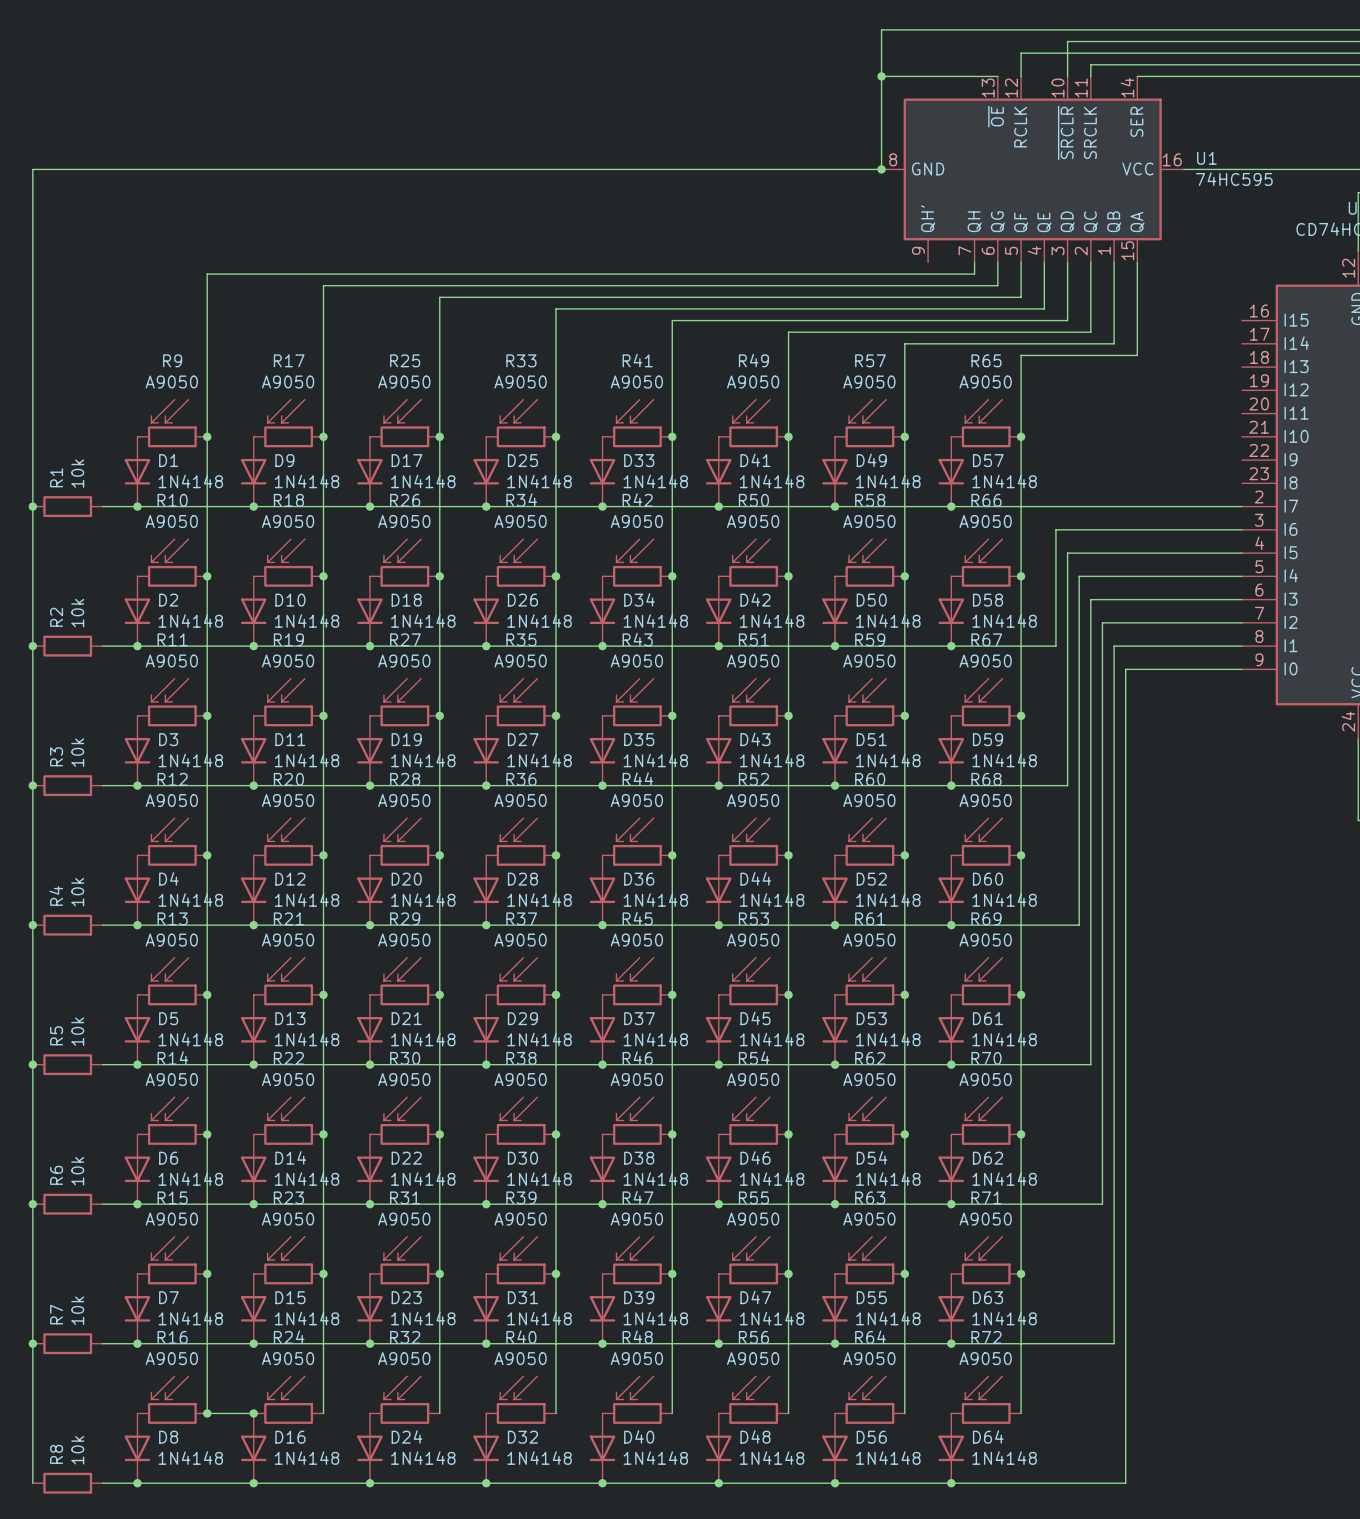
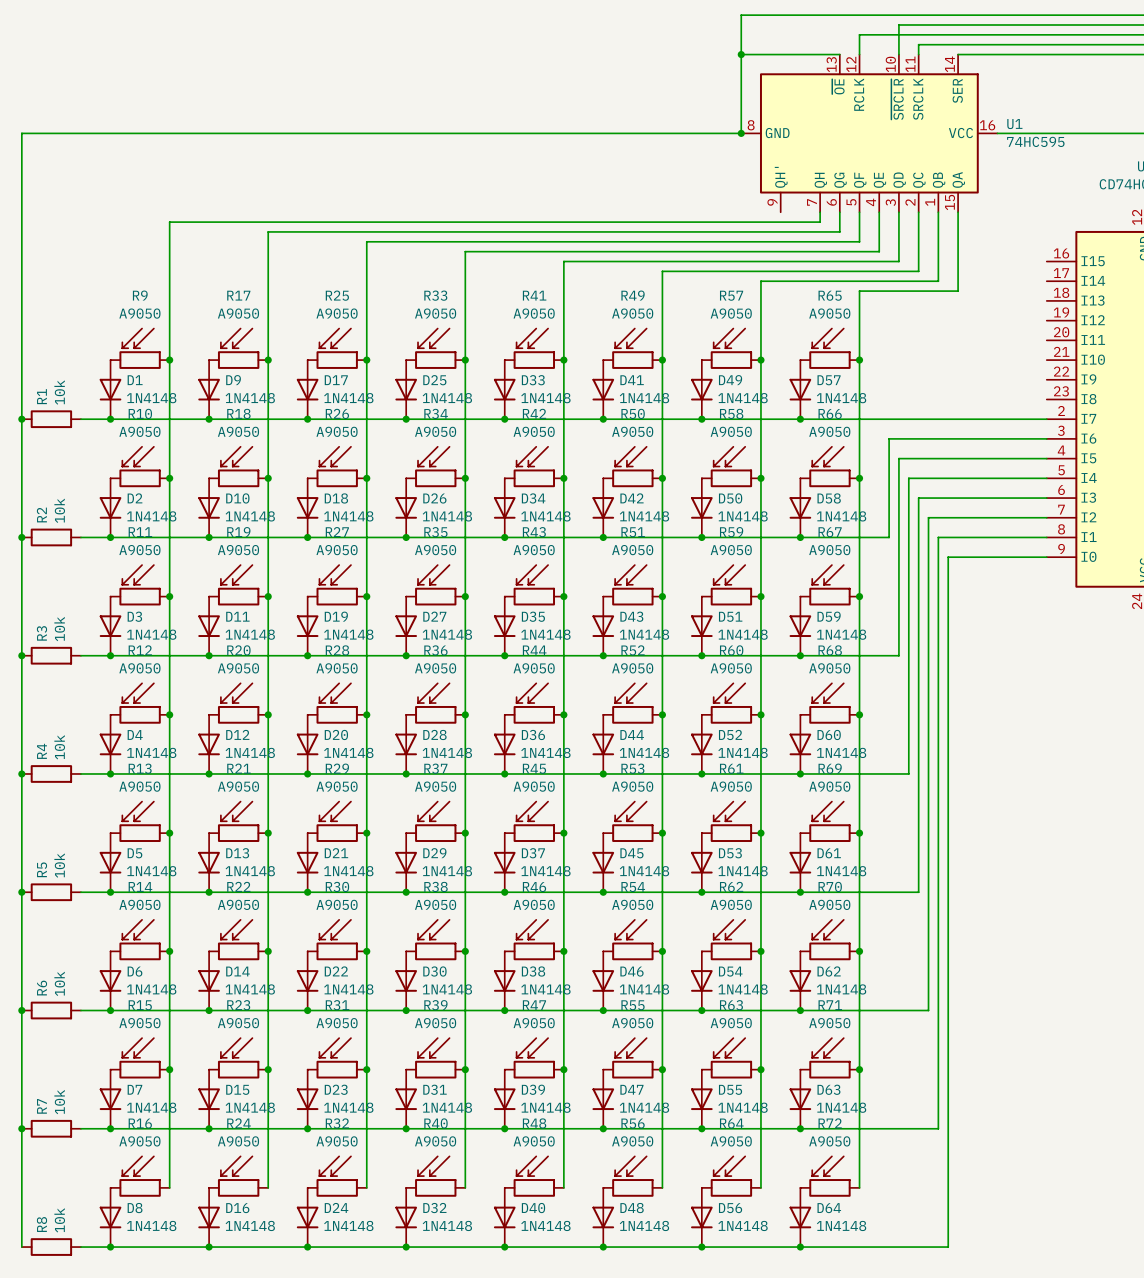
wire: (207, 1413) (253, 1413) -> none
junction: (207, 1413) -> none
junction: (253, 1413) -> none

